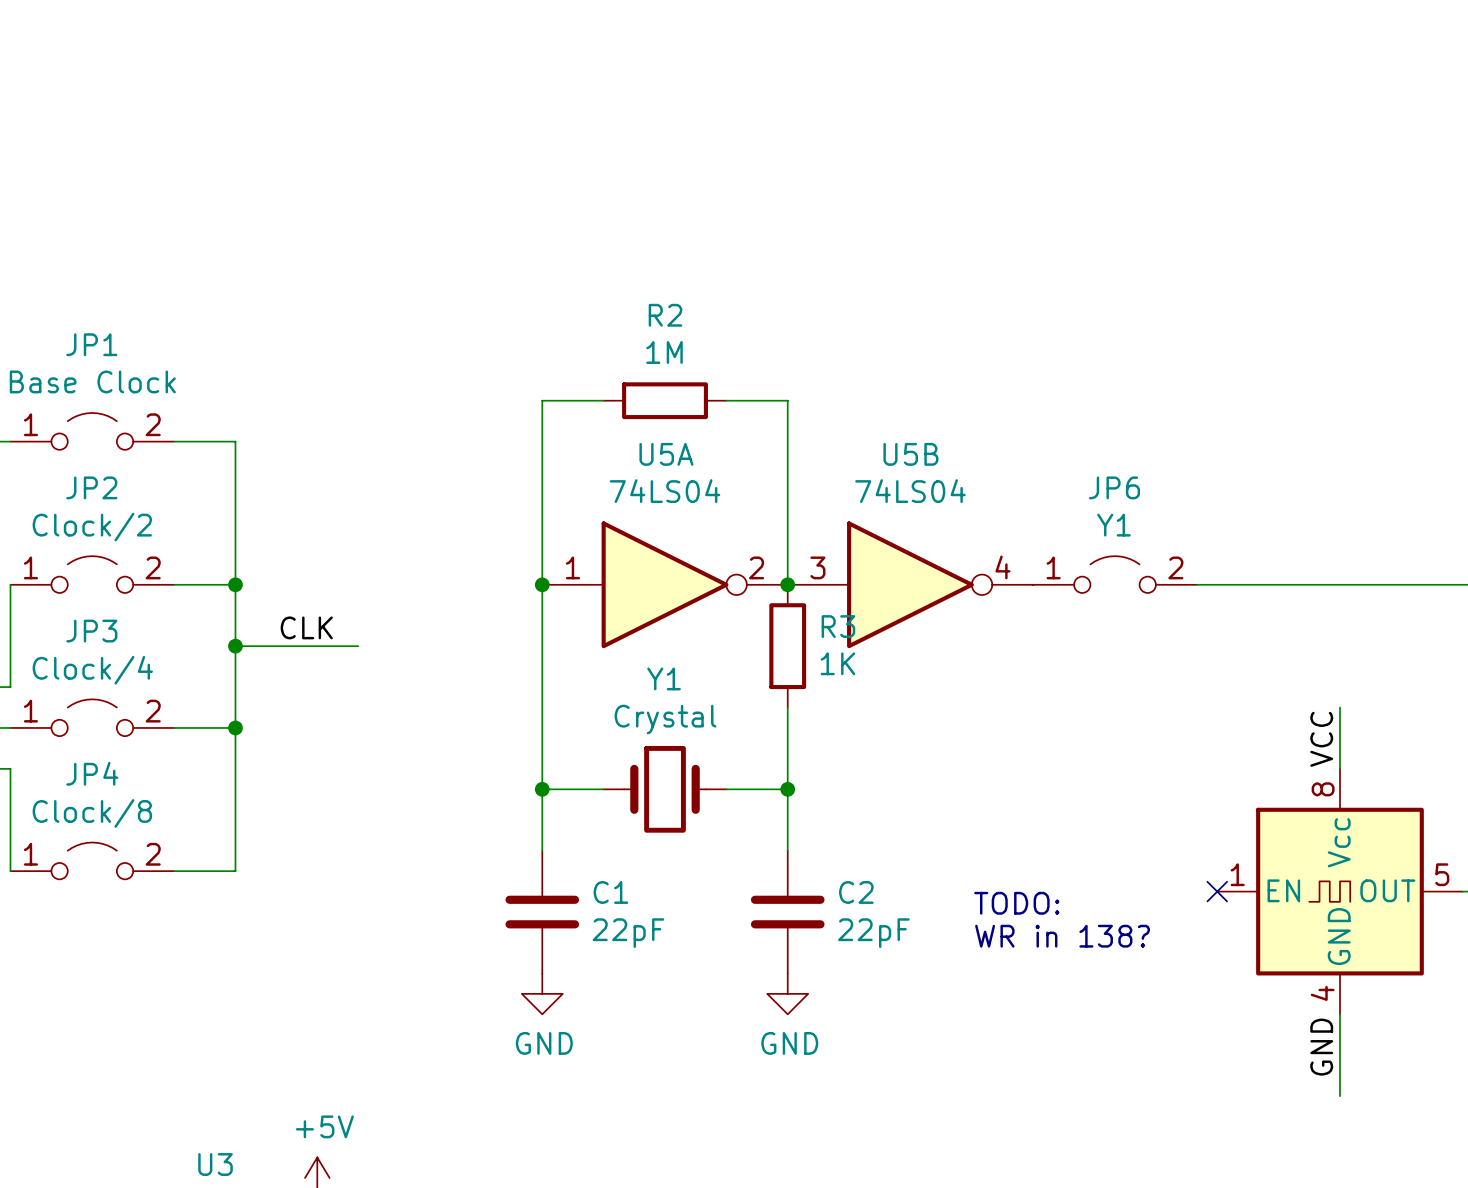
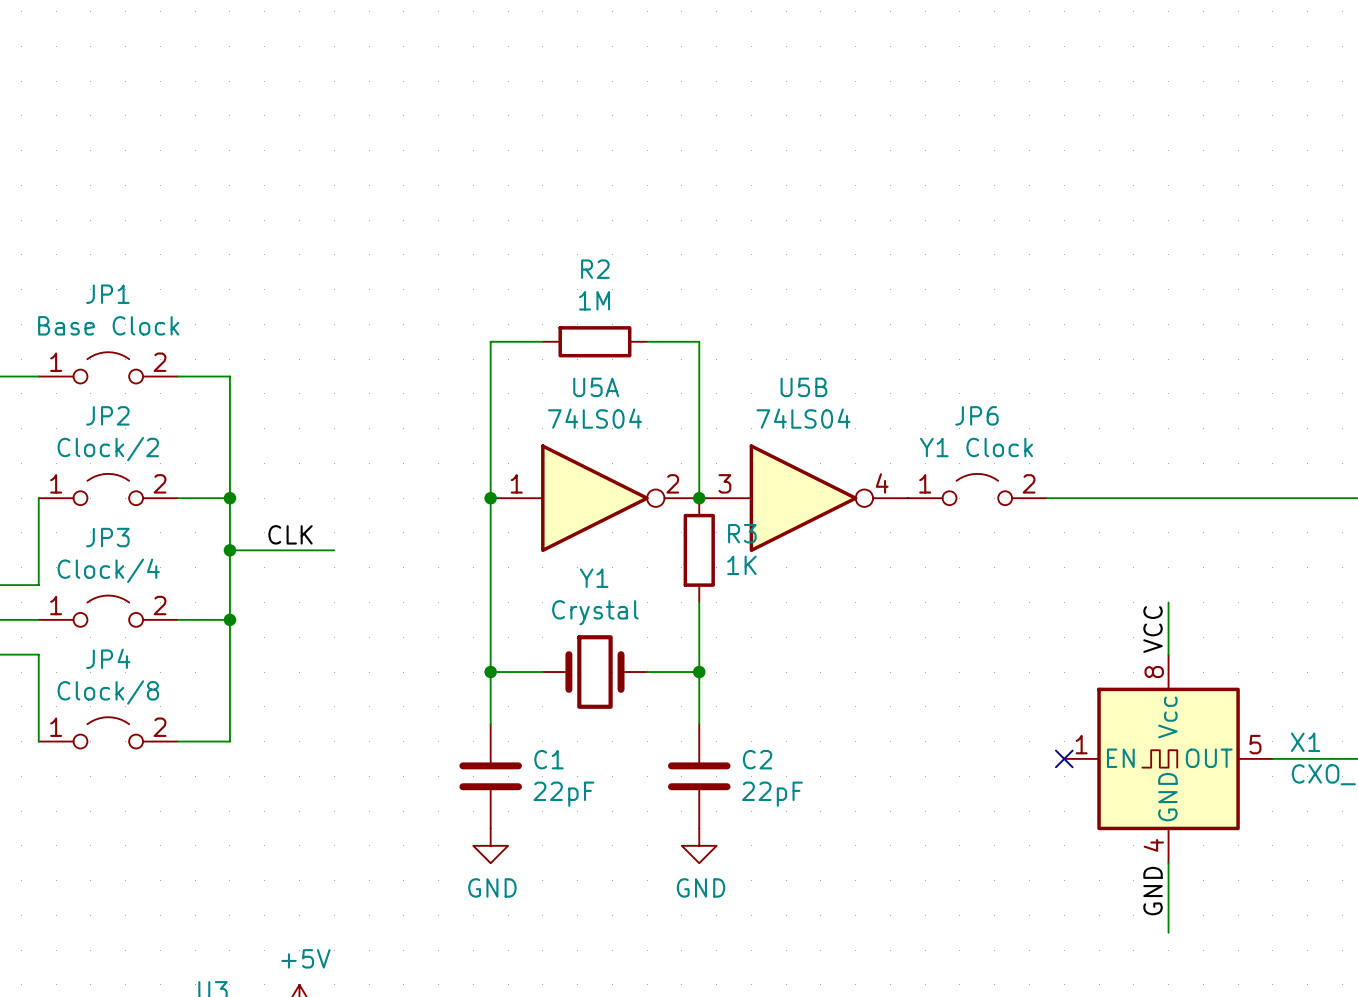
JP6 value: Y1 (1114, 525) -> Y1 Clock (976, 447)
text: TODO: (1016, 903) -> none
text: WR in 138? (1062, 936) -> none

